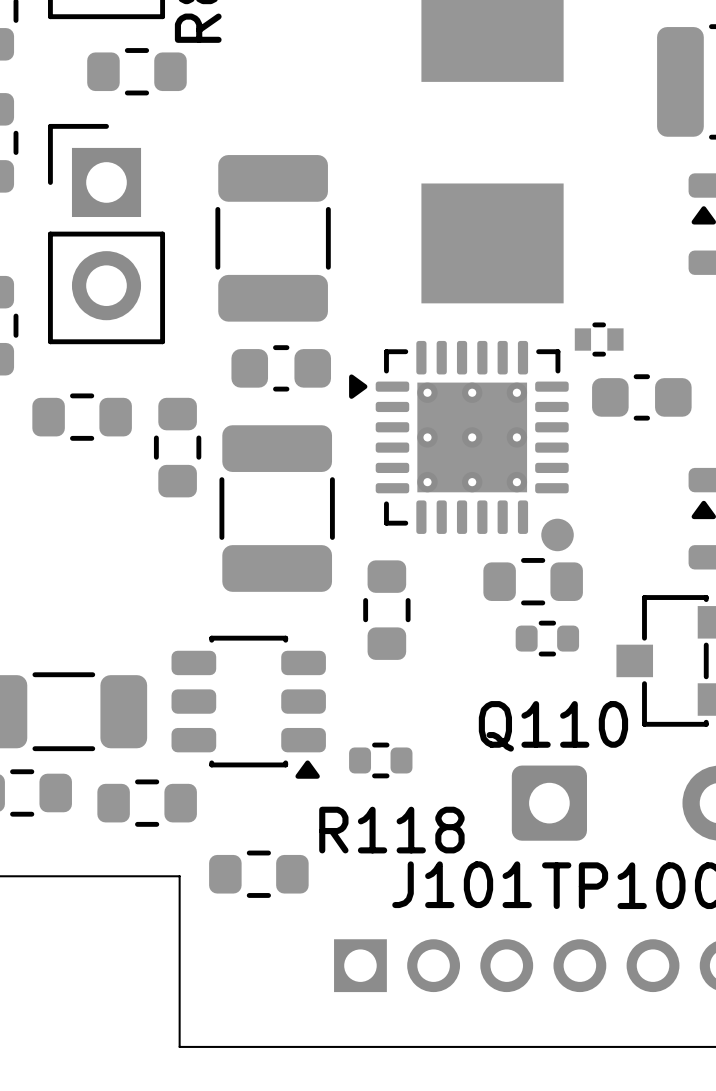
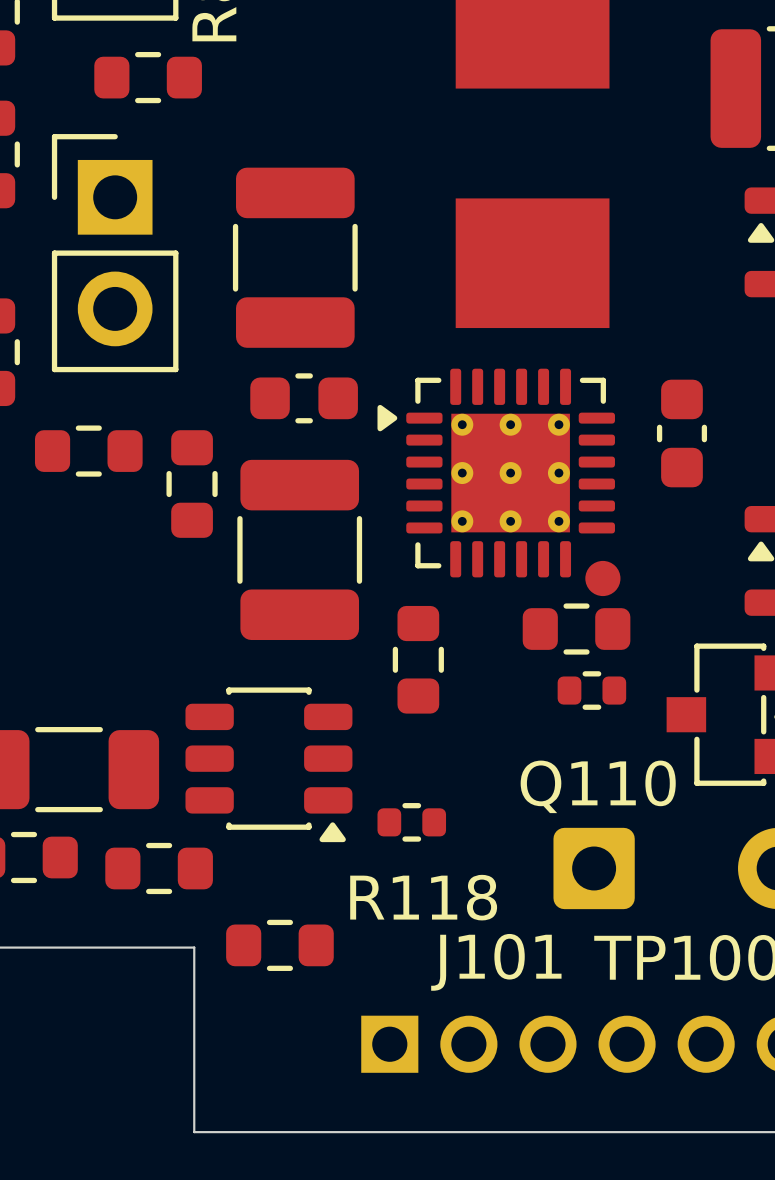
part: (599, 339) -> none
part rotation: 0° (641, 397) -> 90° clockwise (681, 433)

